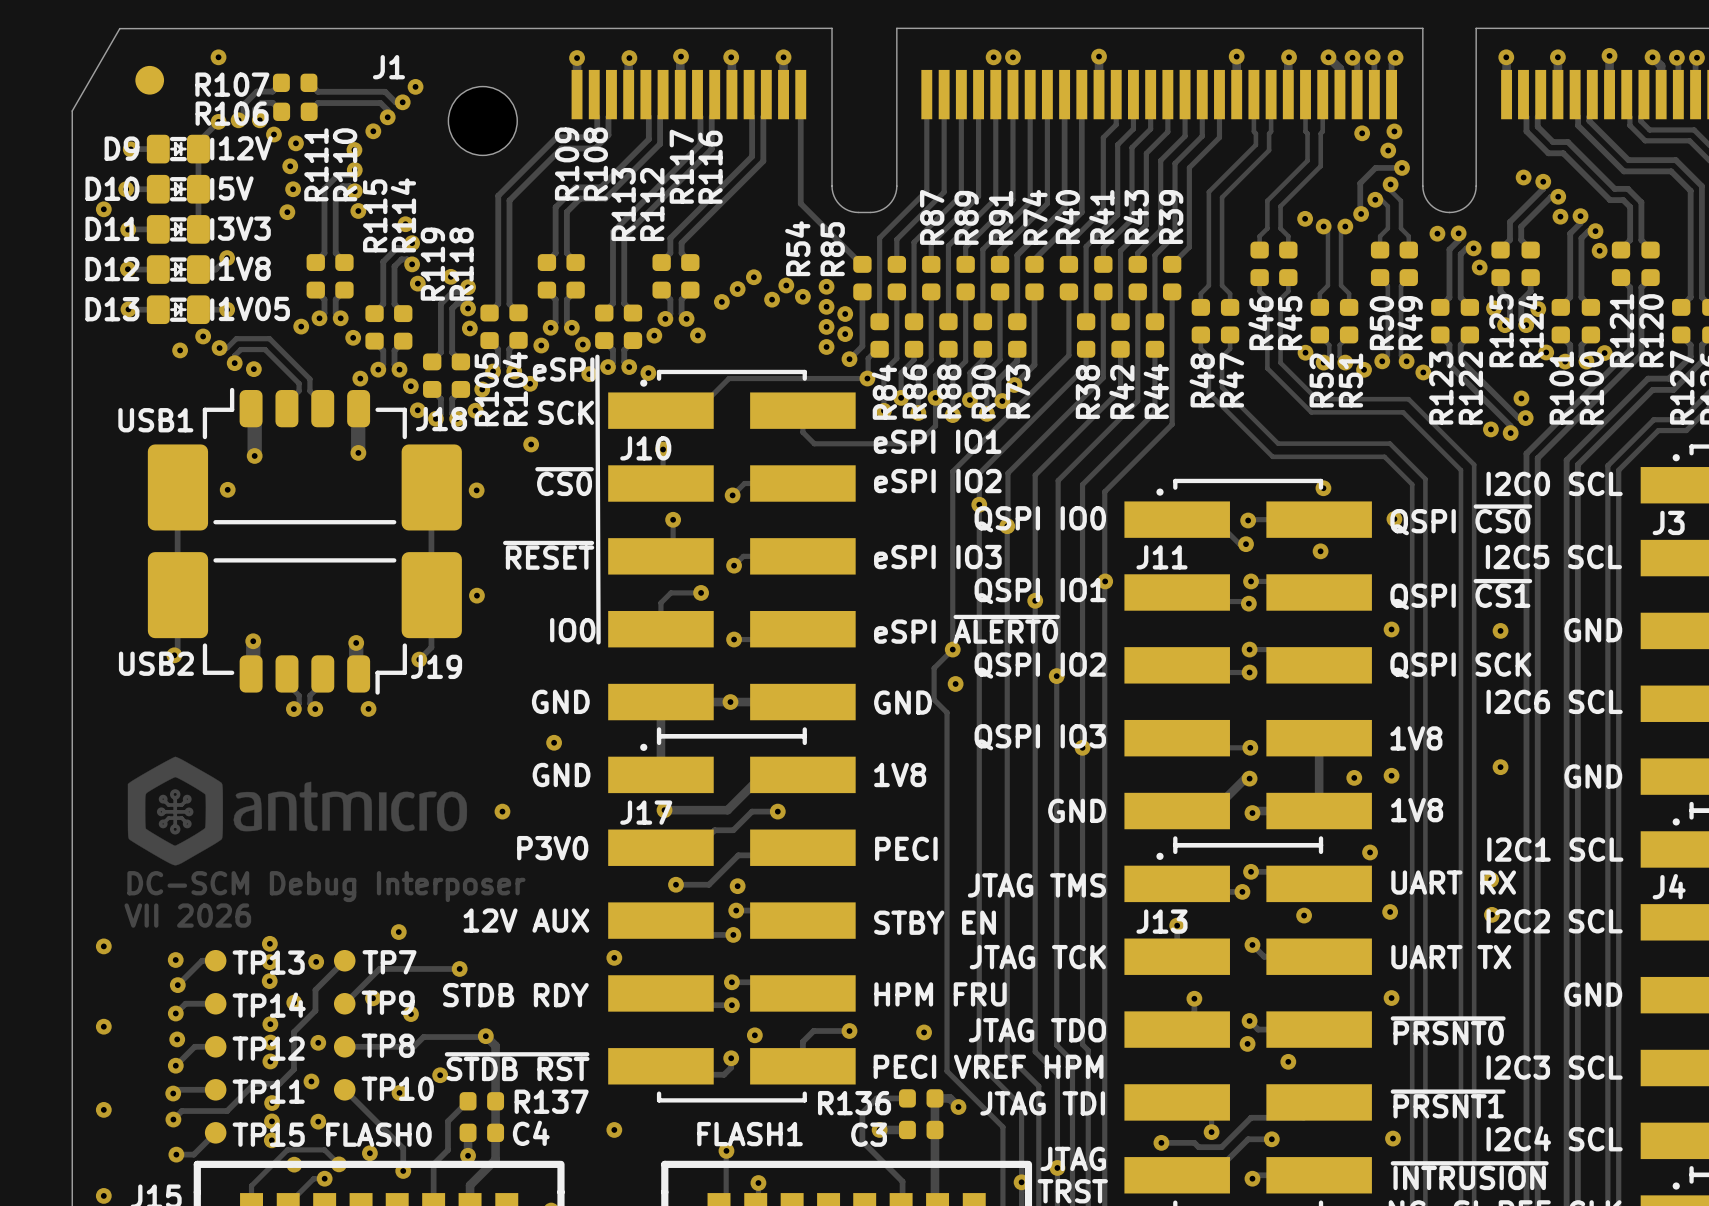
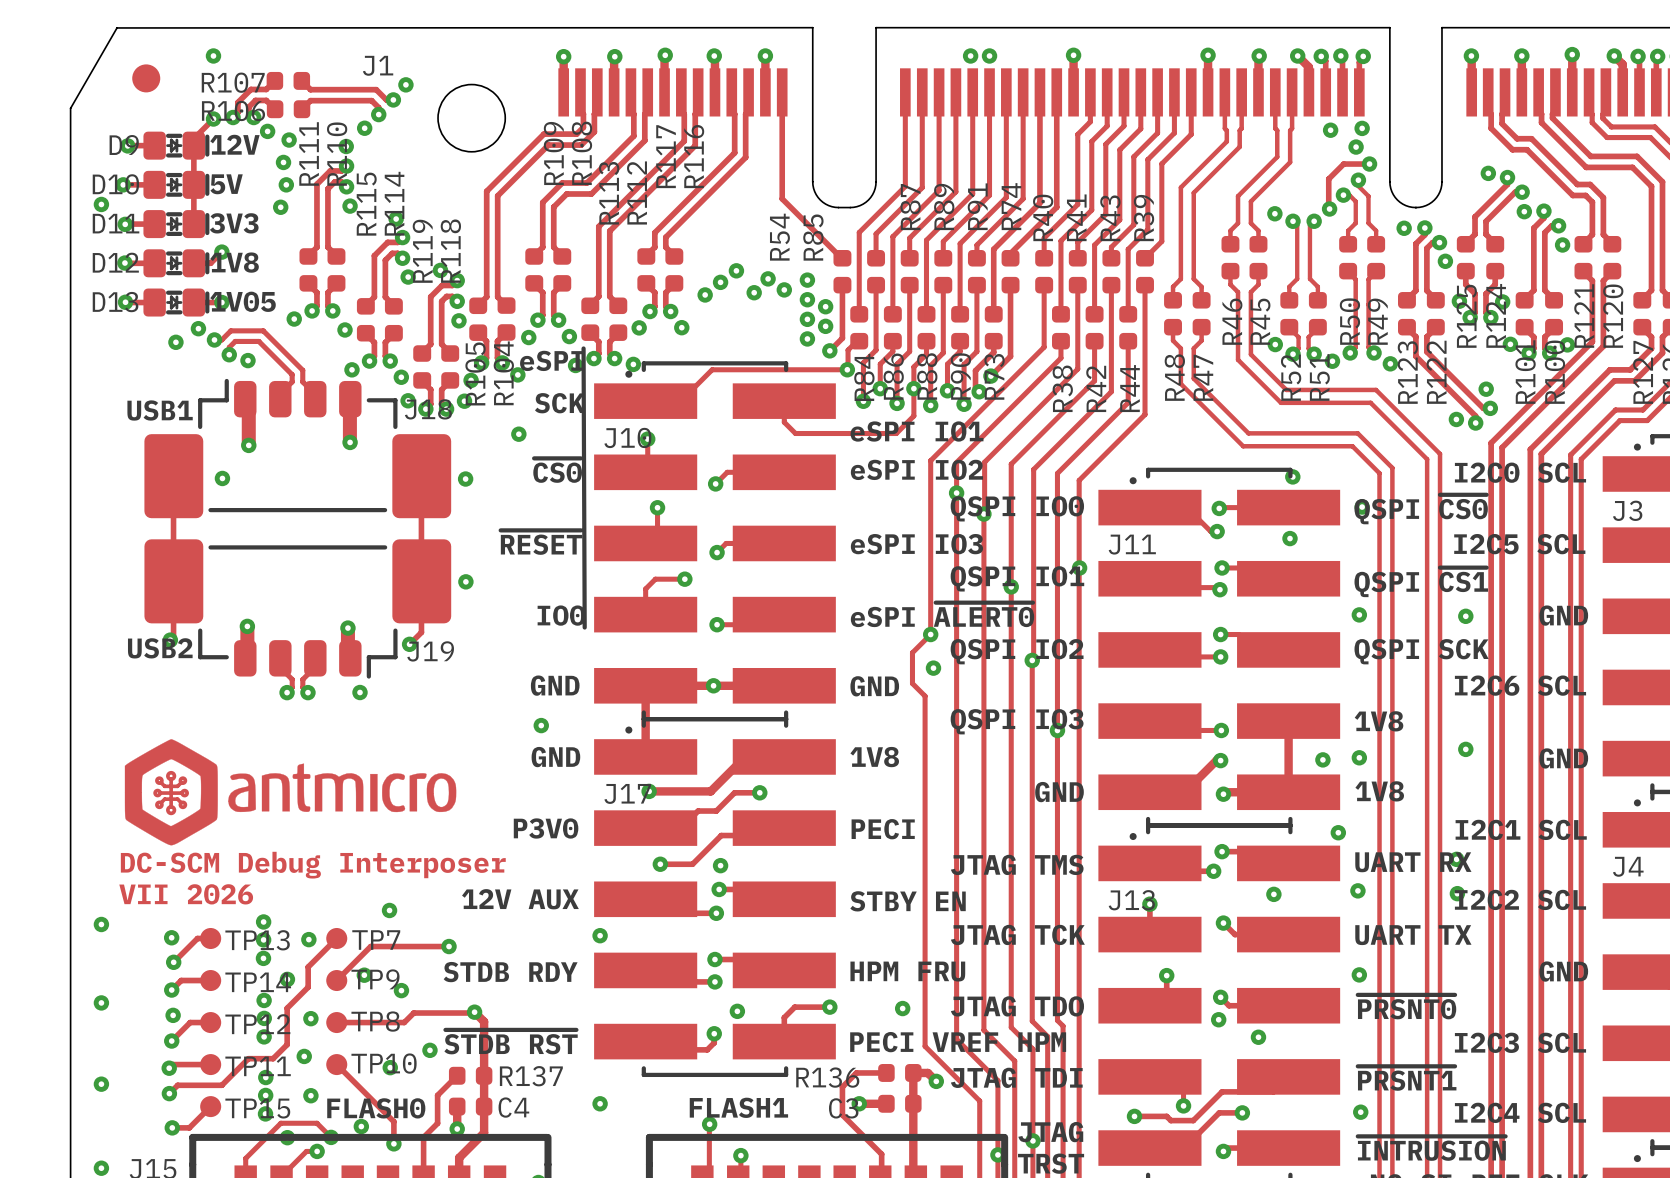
via: (502, 811) -> none

